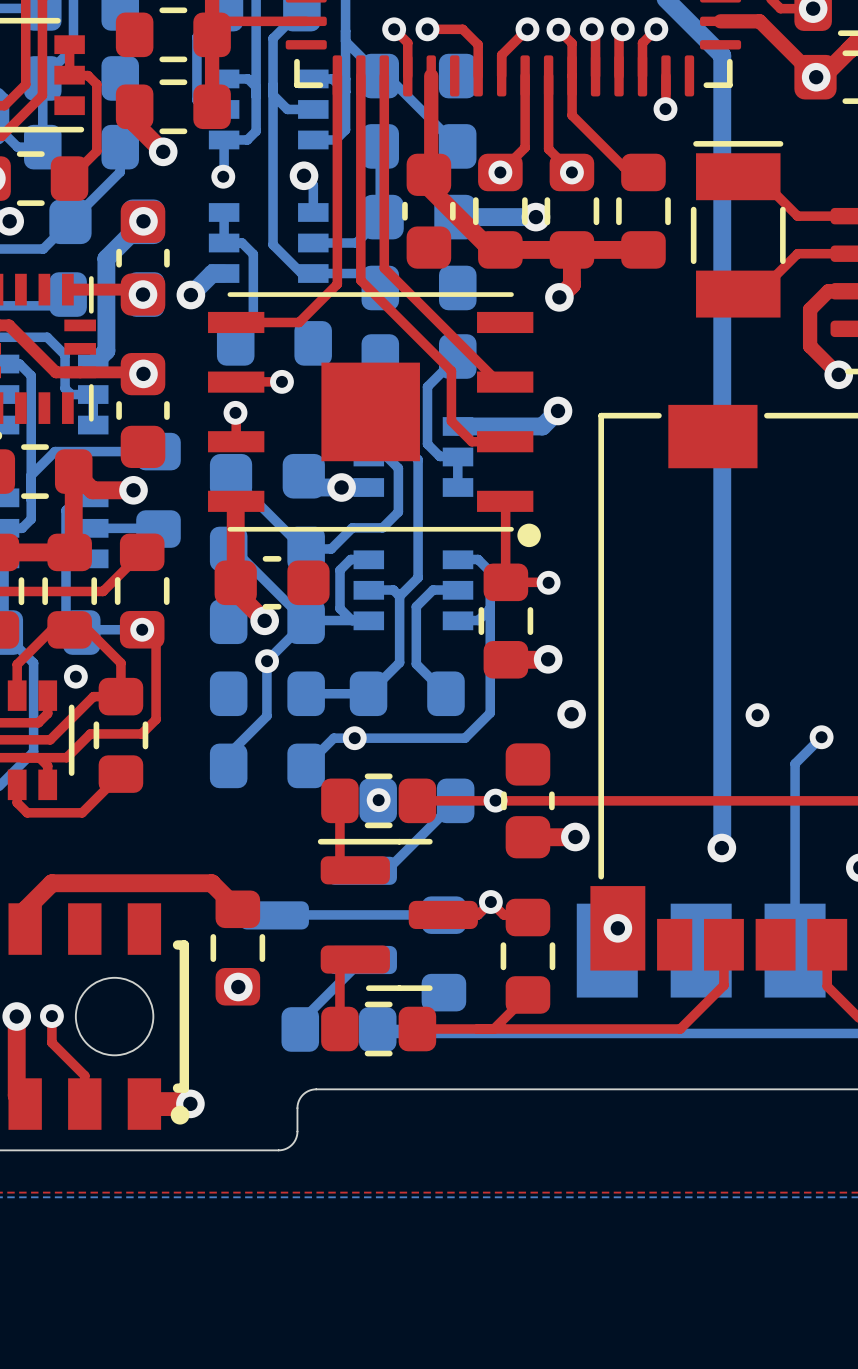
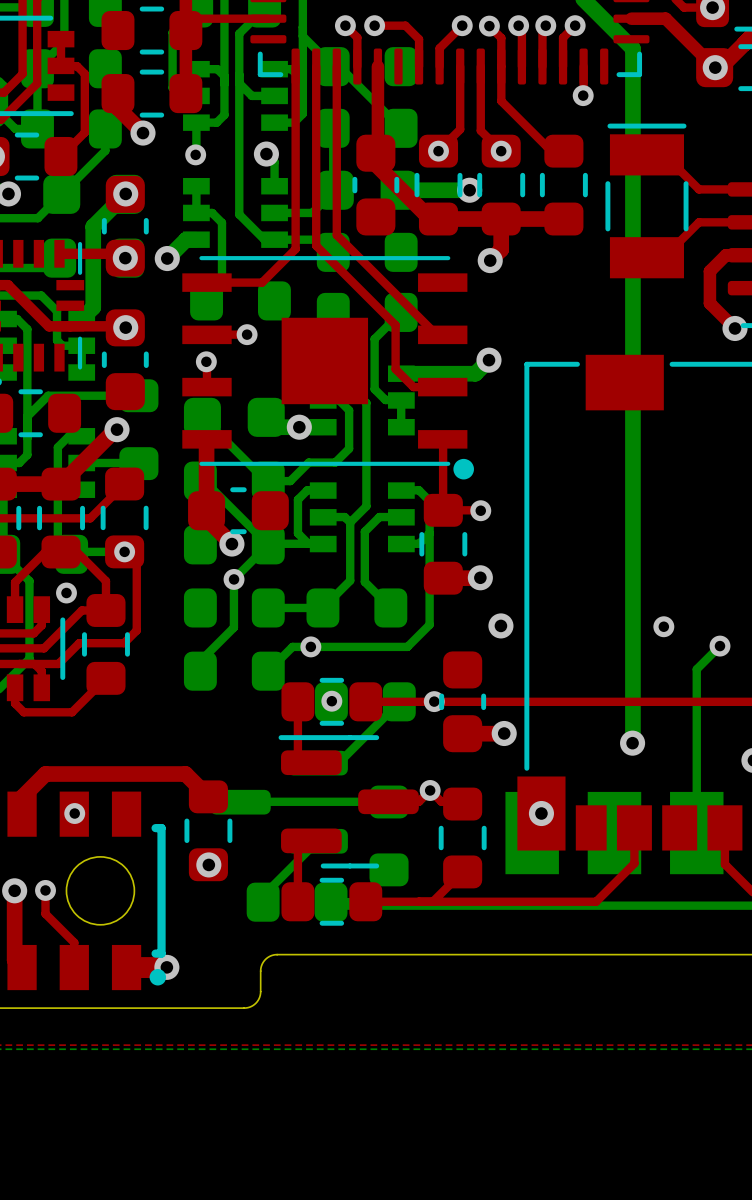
top track: (133, 490) (92, 490) (73, 471) (73, 548) -> (114, 430) (64, 480)
via: none -> (74, 813)

